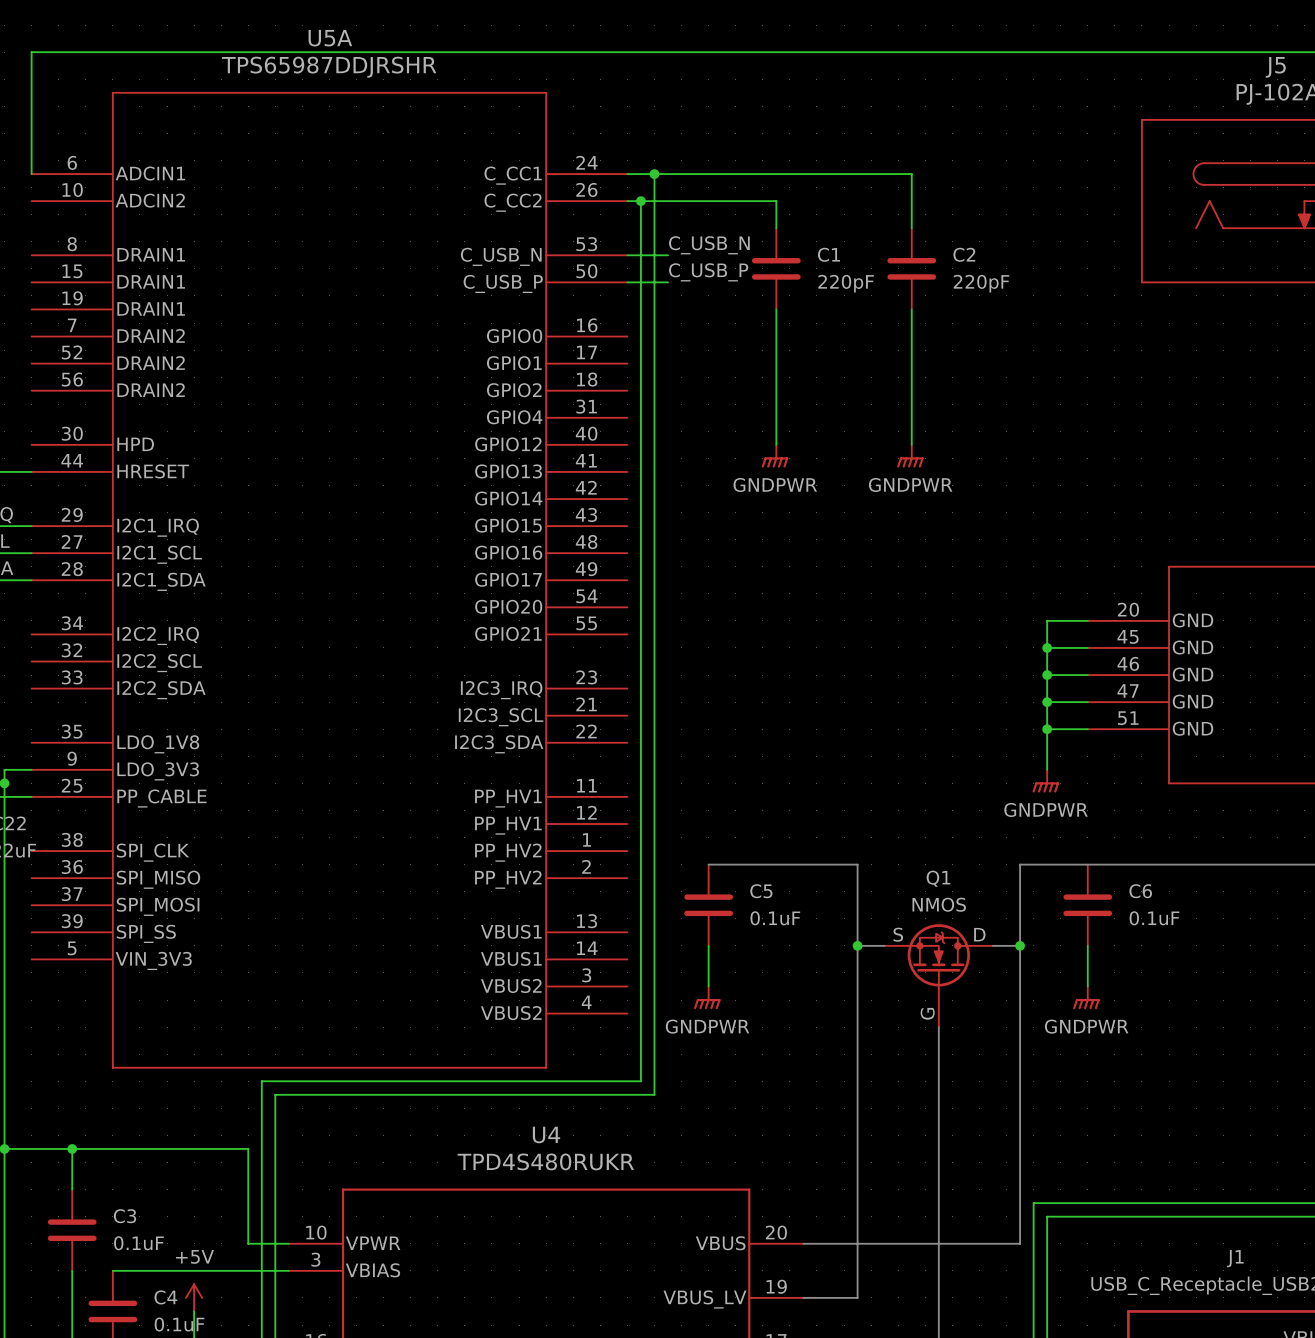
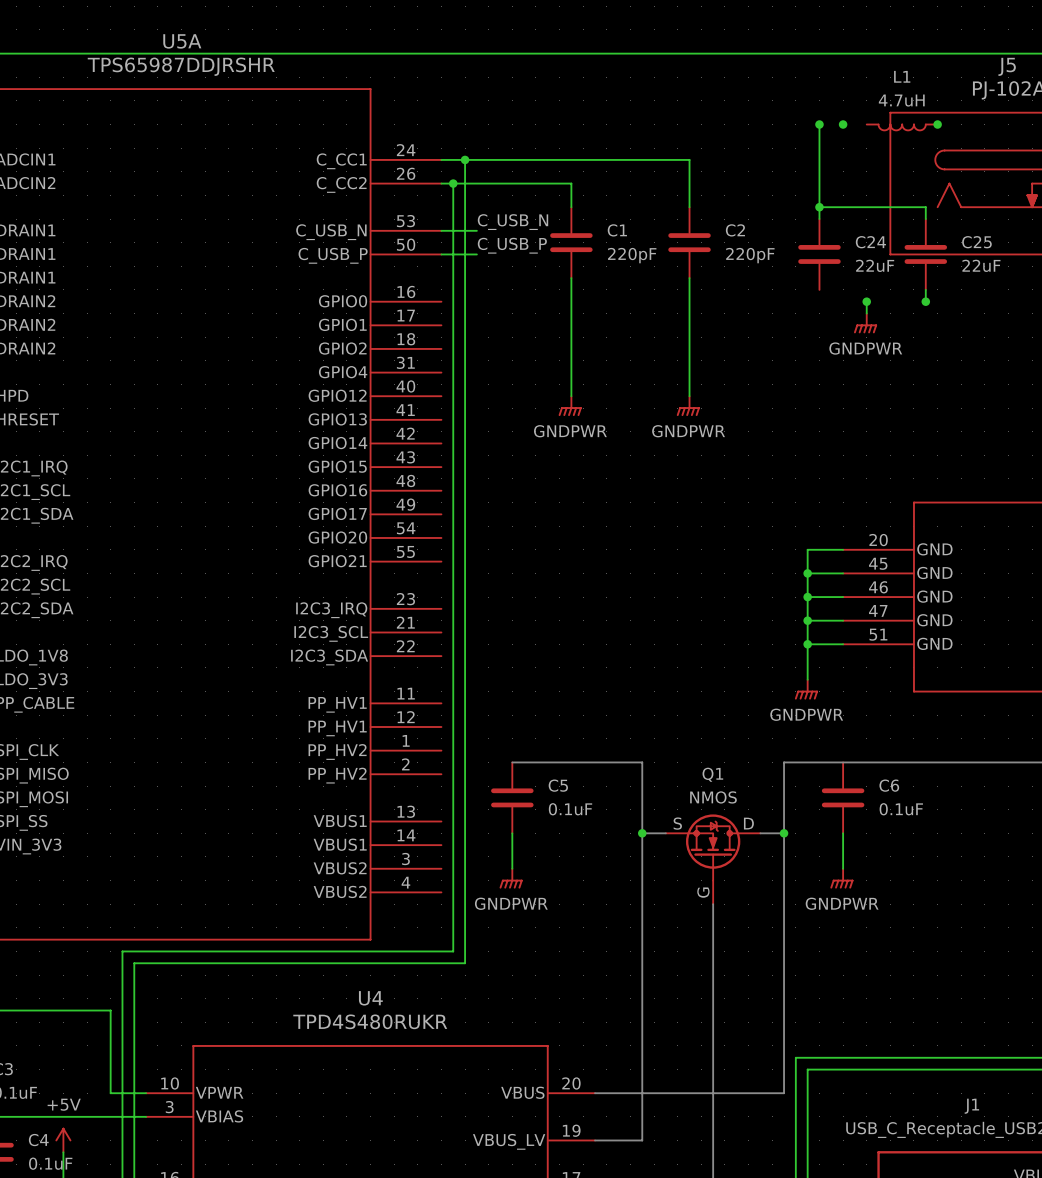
wire: none -> (819, 124) (819, 219)
junction: none -> (819, 124)
junction: none -> (843, 124)
junction: none -> (937, 124)
L1: none -> 4.7uH (902, 127)
wire: none -> (819, 207) (925, 207) (925, 219)
junction: none -> (819, 207)
C24: none -> 22uF (819, 254)
C25: none -> 22uF (925, 254)
wire: none -> (925, 289) (925, 301)
wire: none -> (866, 301) (866, 313)
junction: none -> (866, 301)
junction: none -> (925, 301)
power symbol: none -> GNDPWR (865, 323)

